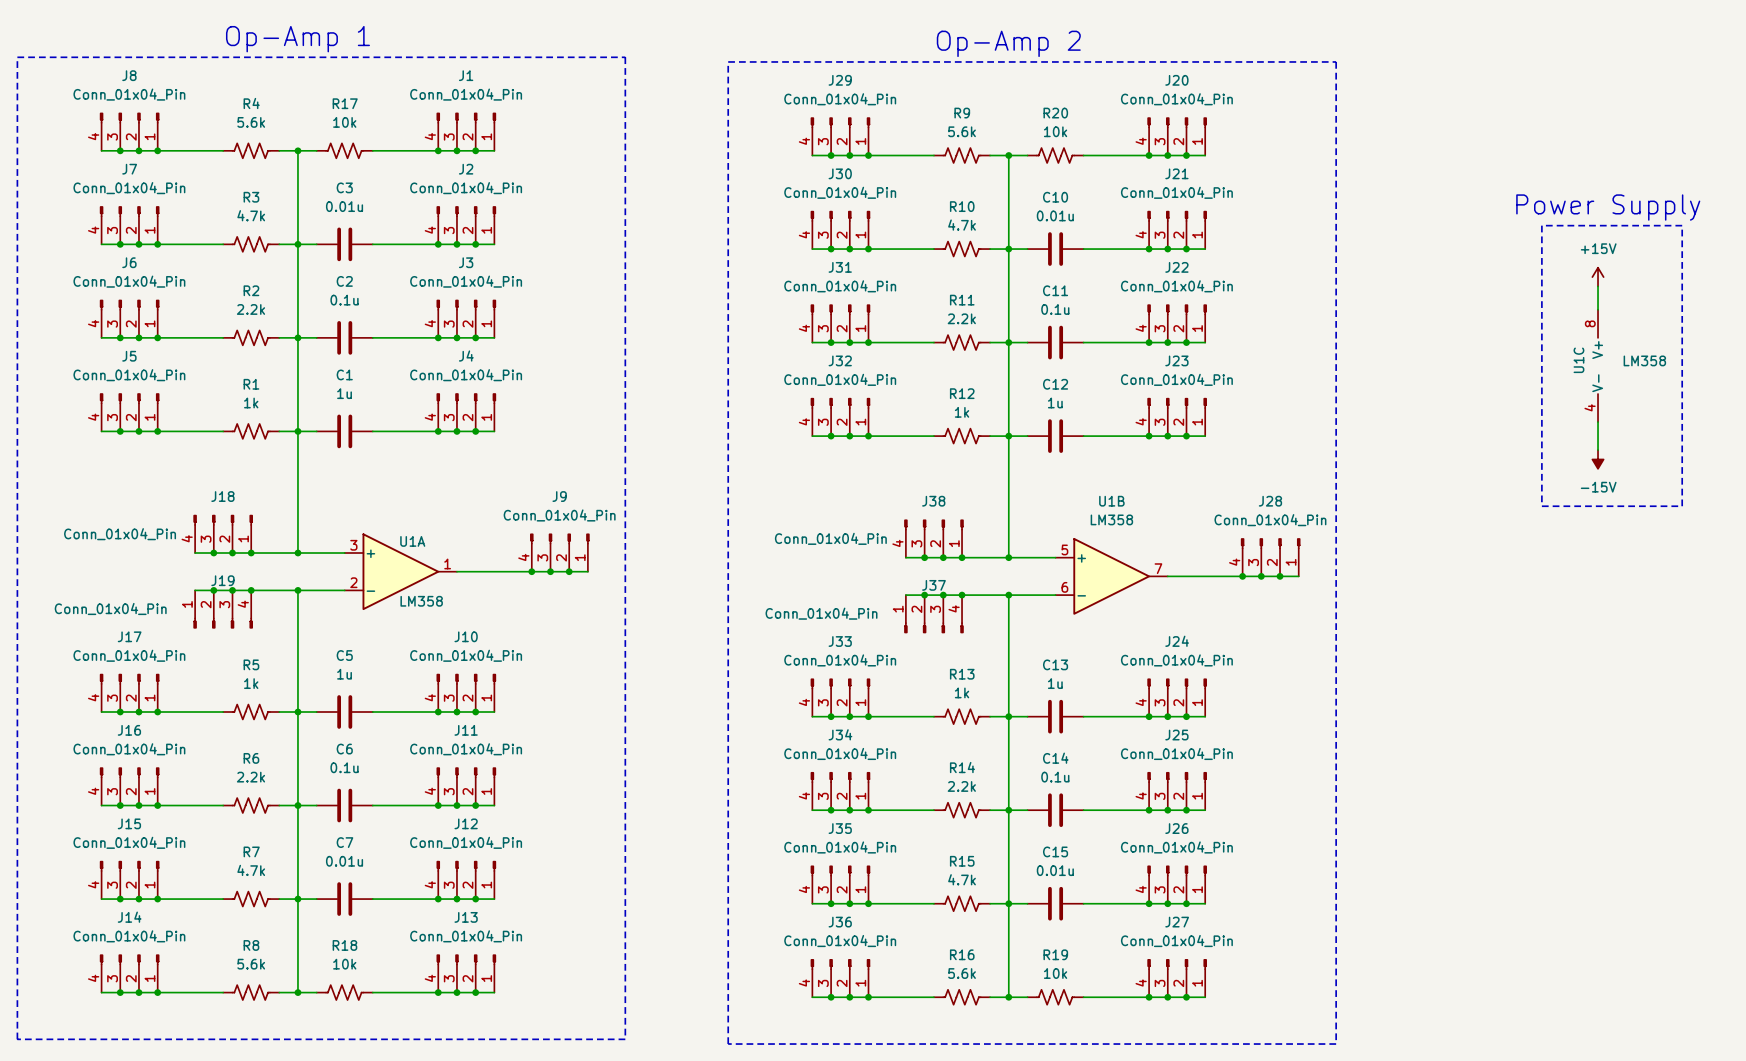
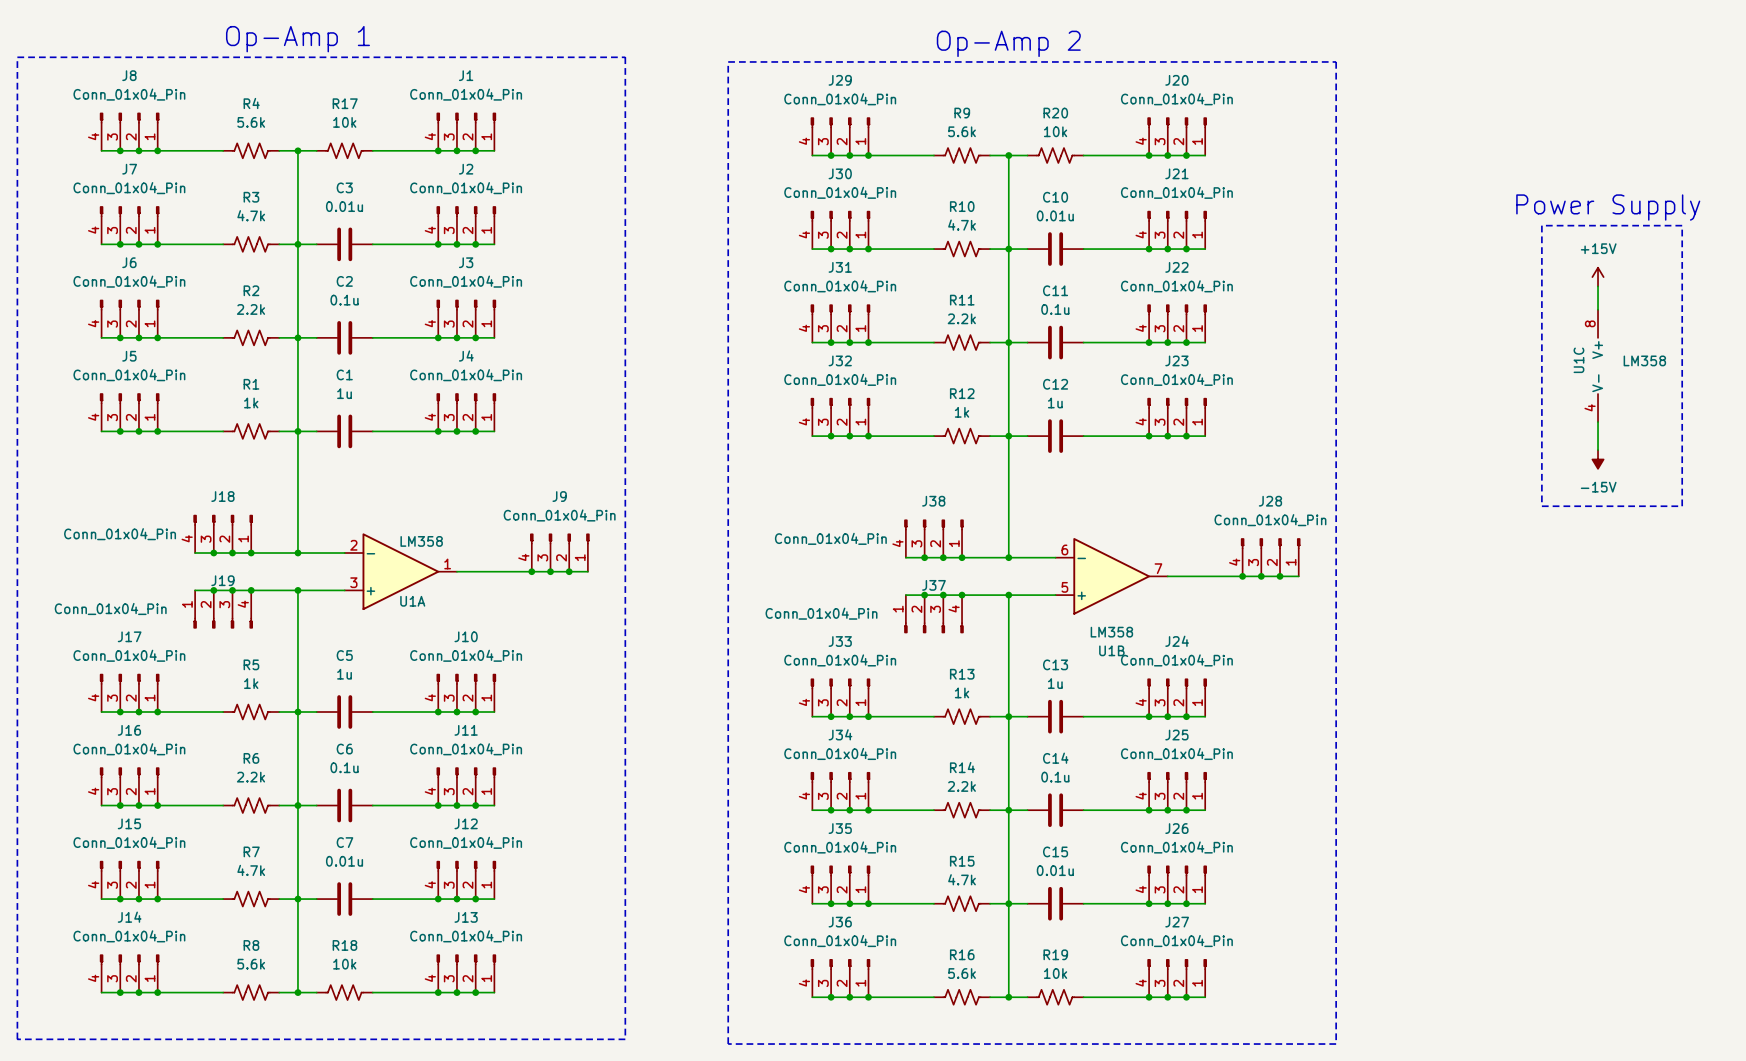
U1A flip: as is (400, 571) -> up-down (400, 571)
U1B flip: as is (1111, 576) -> up-down (1111, 576)

